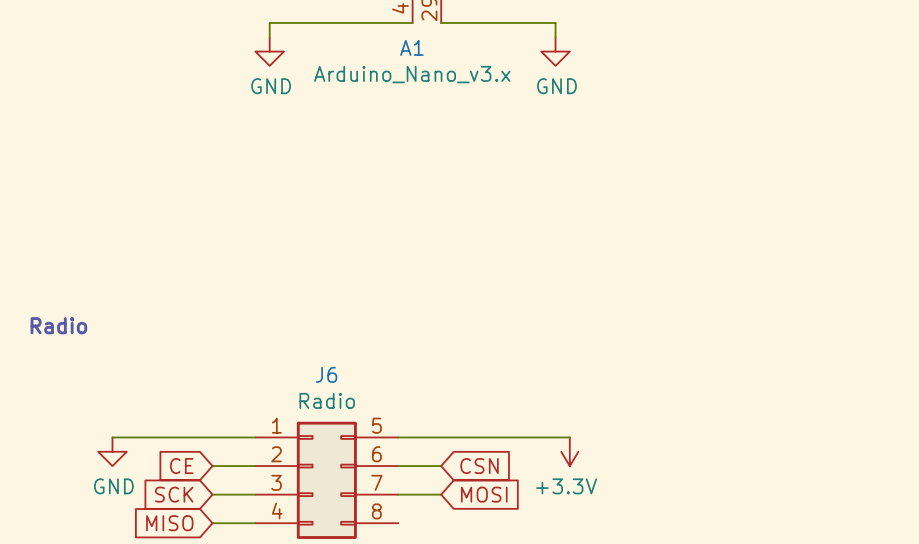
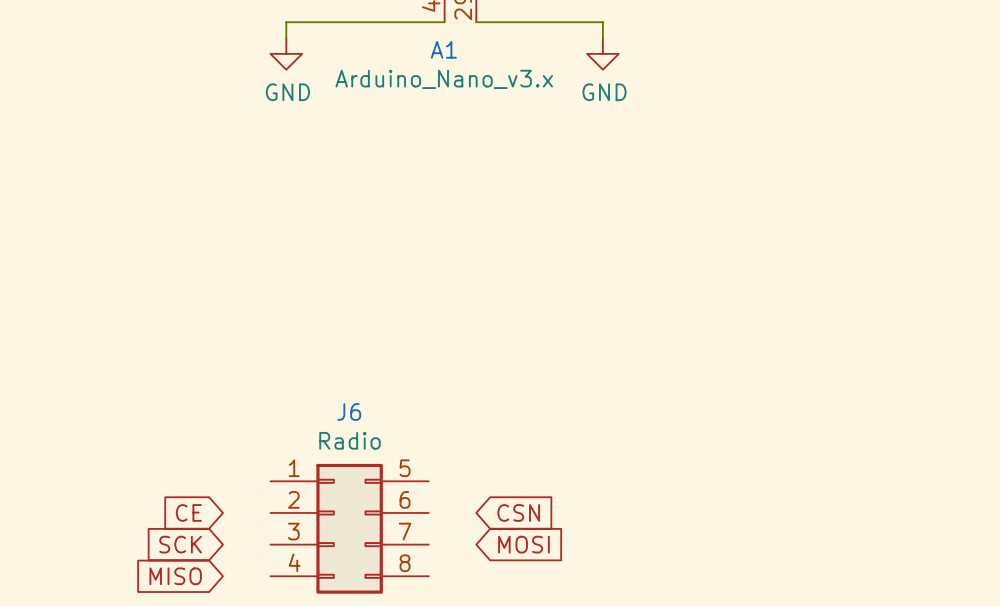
text: Radio (58, 325) -> none
wire: (112, 437) (255, 437) -> none
wire: (398, 437) (569, 437) -> none
power symbol: GND (112, 451) -> none
power symbol: +3.3V (569, 451) -> none
wire: (212, 466) (255, 466) -> none
wire: (398, 466) (441, 466) -> none
wire: (212, 494) (255, 494) -> none
wire: (398, 494) (441, 494) -> none
wire: (212, 523) (255, 523) -> none

